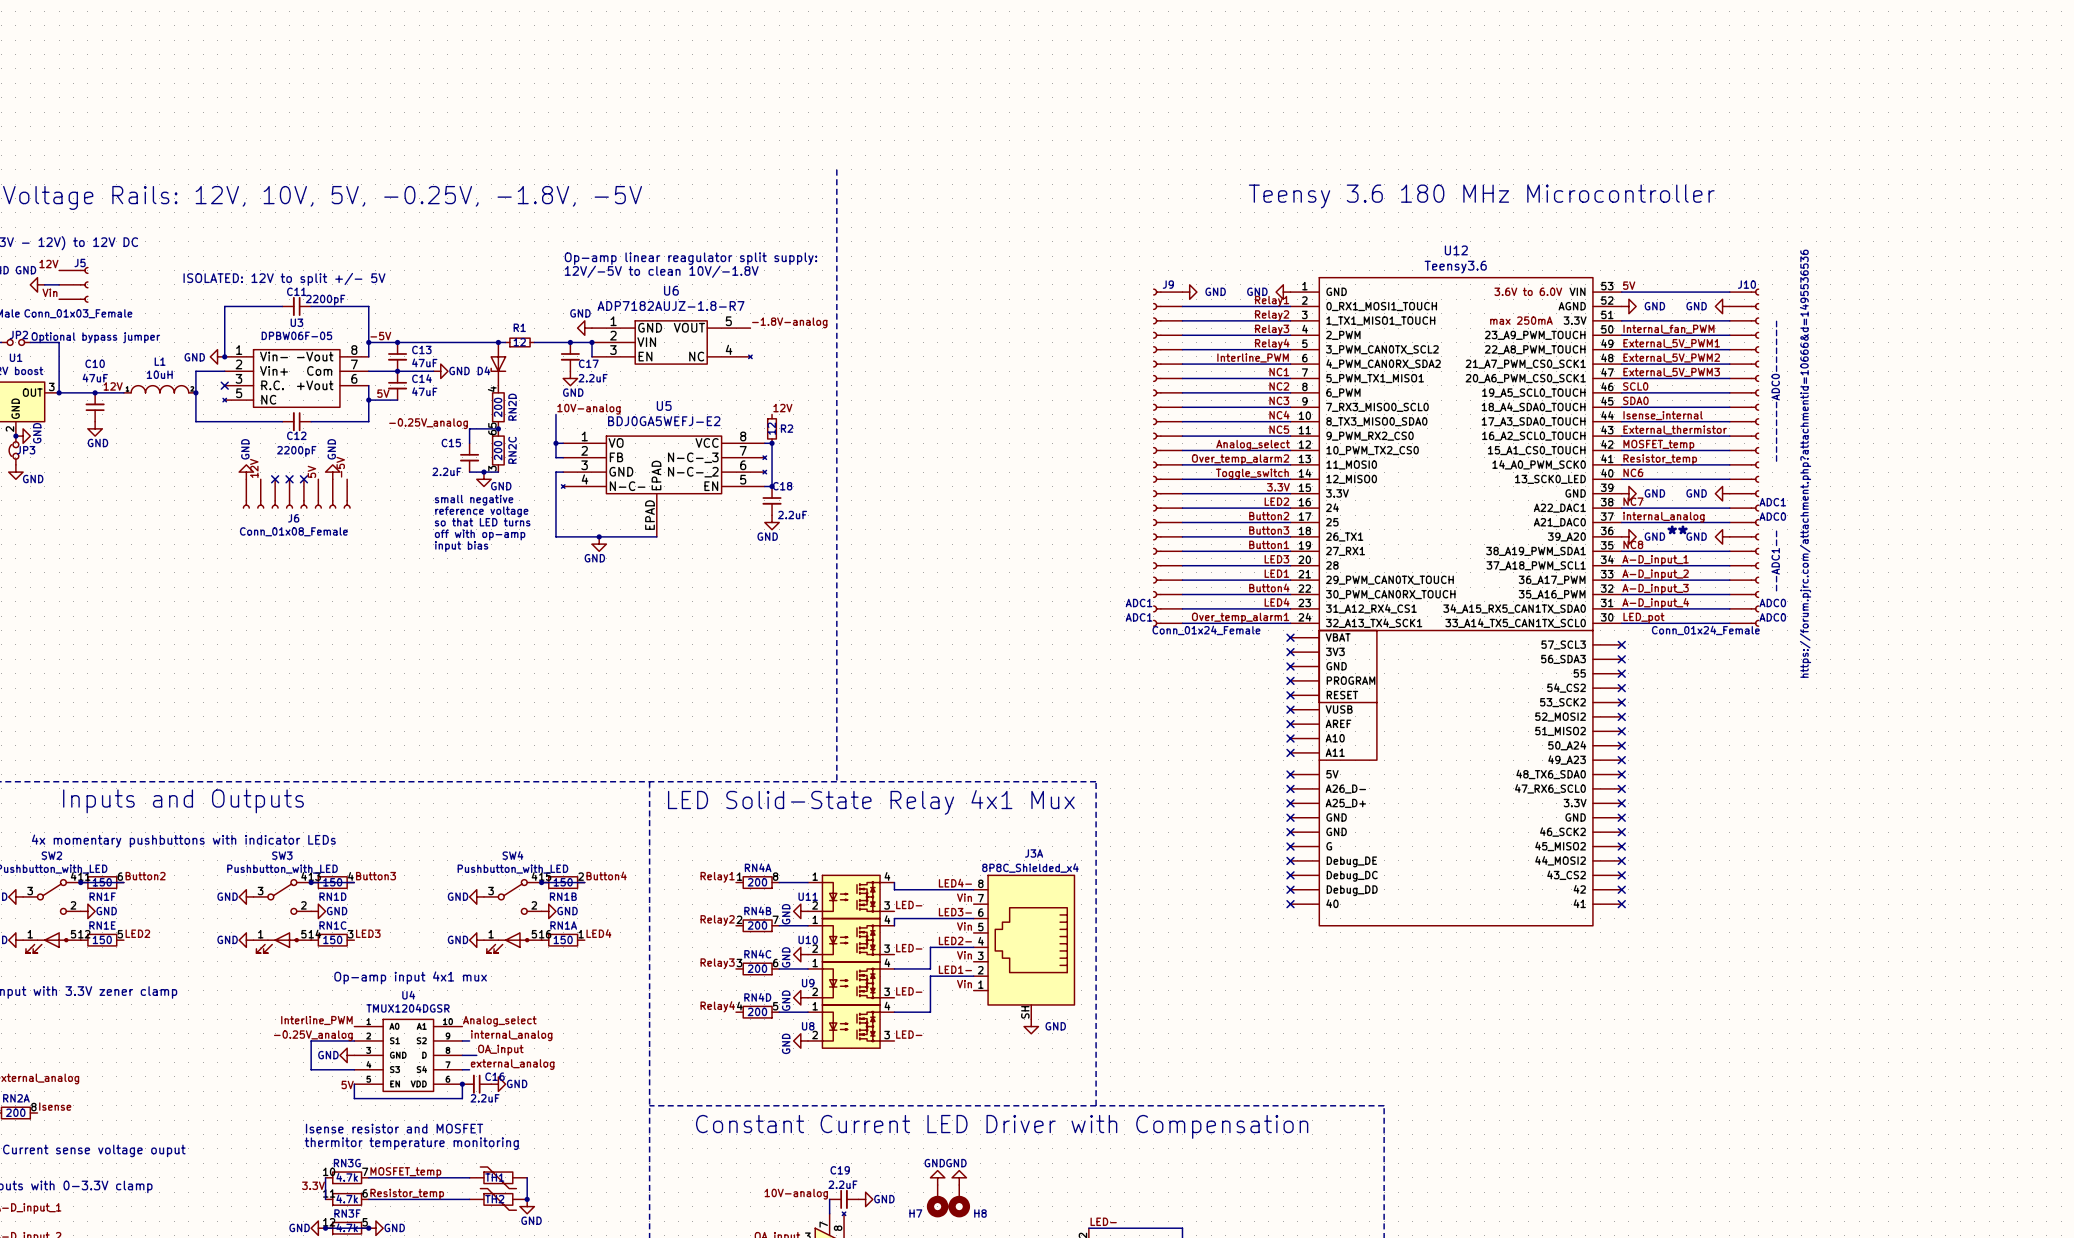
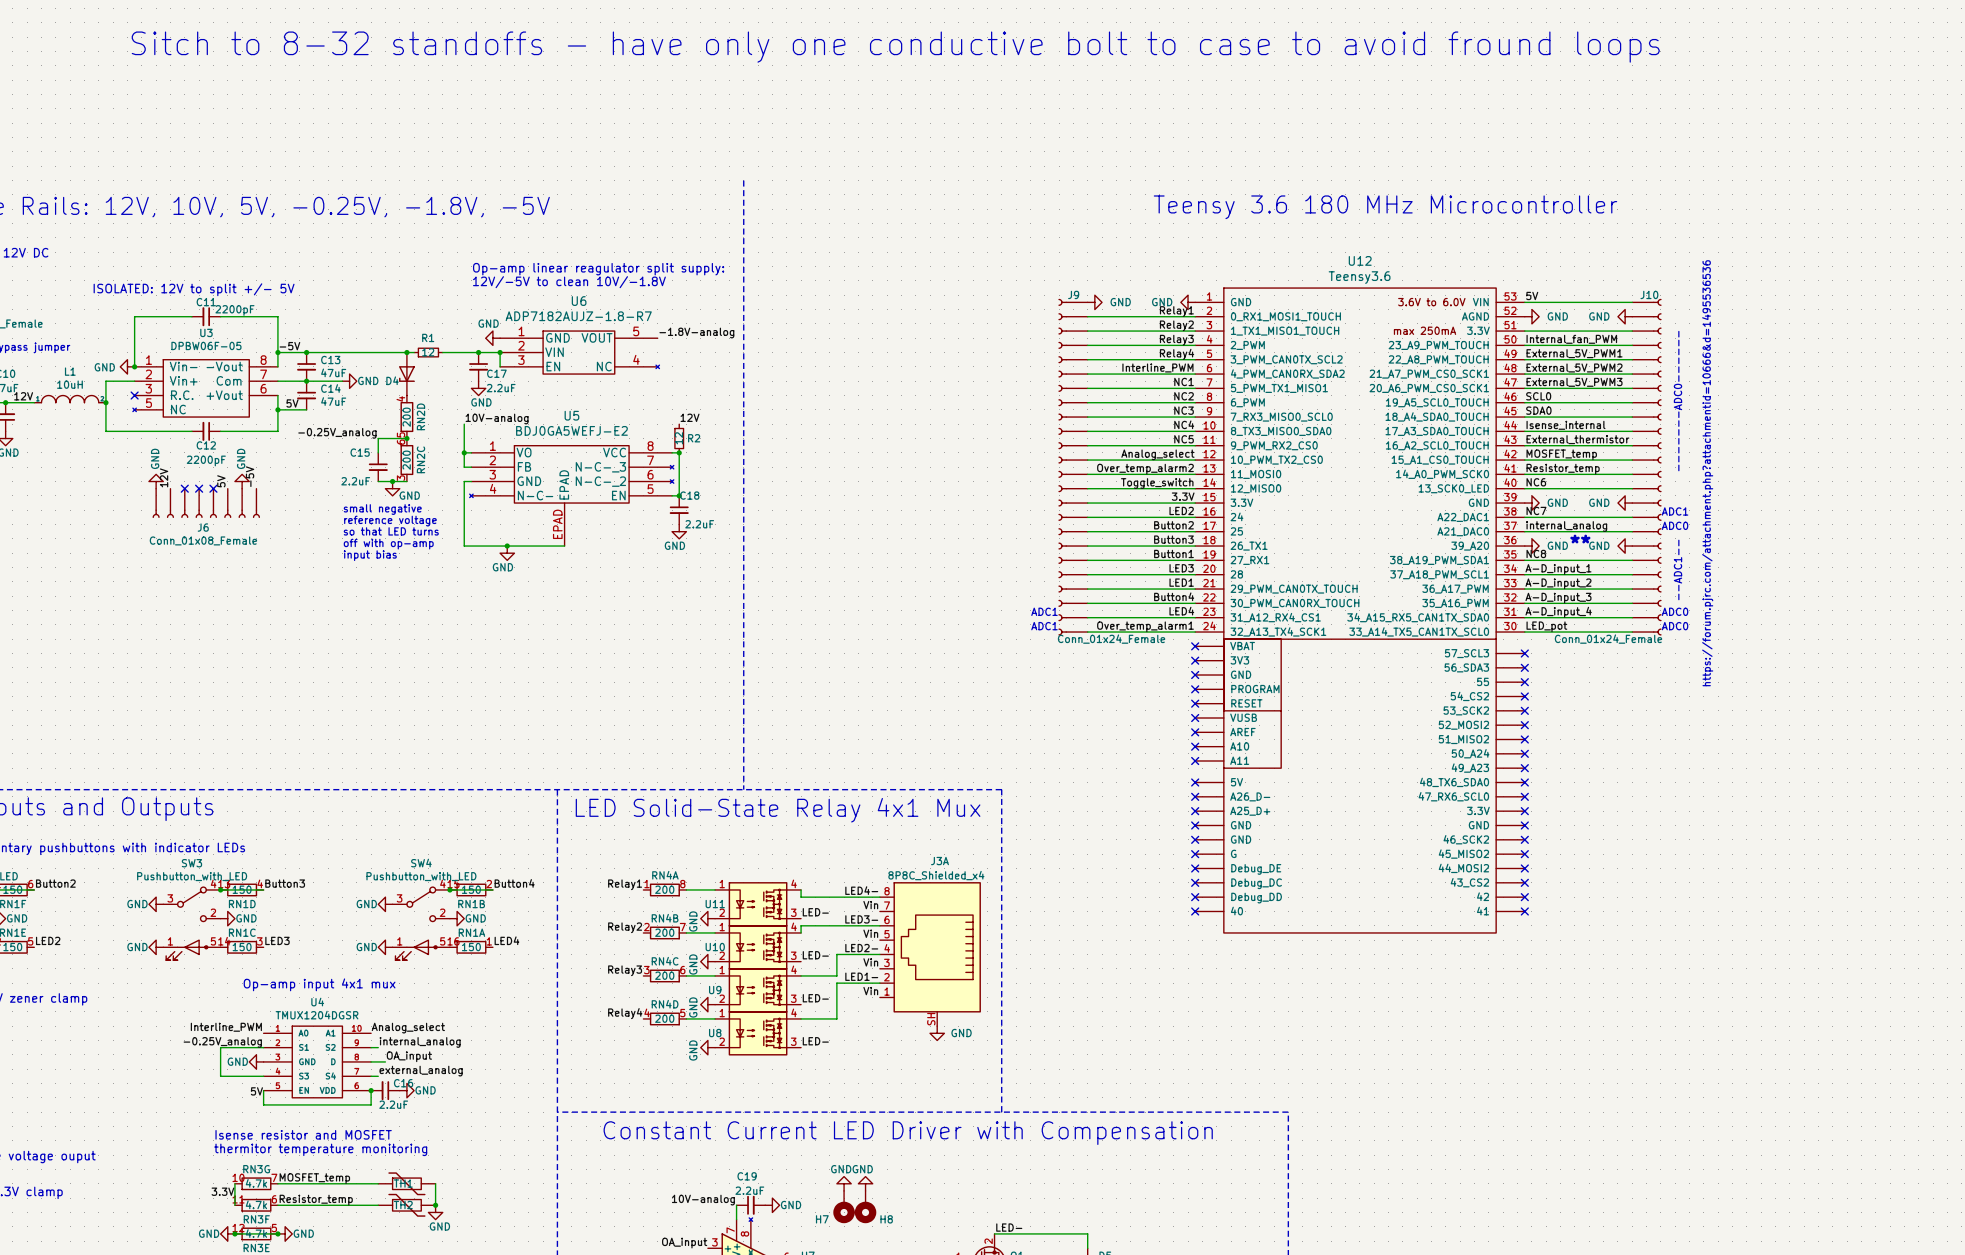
text: none -> Sitch to 8-32 standoffs - have only one conductive bolt to case to avoid fround loops (895, 47)

